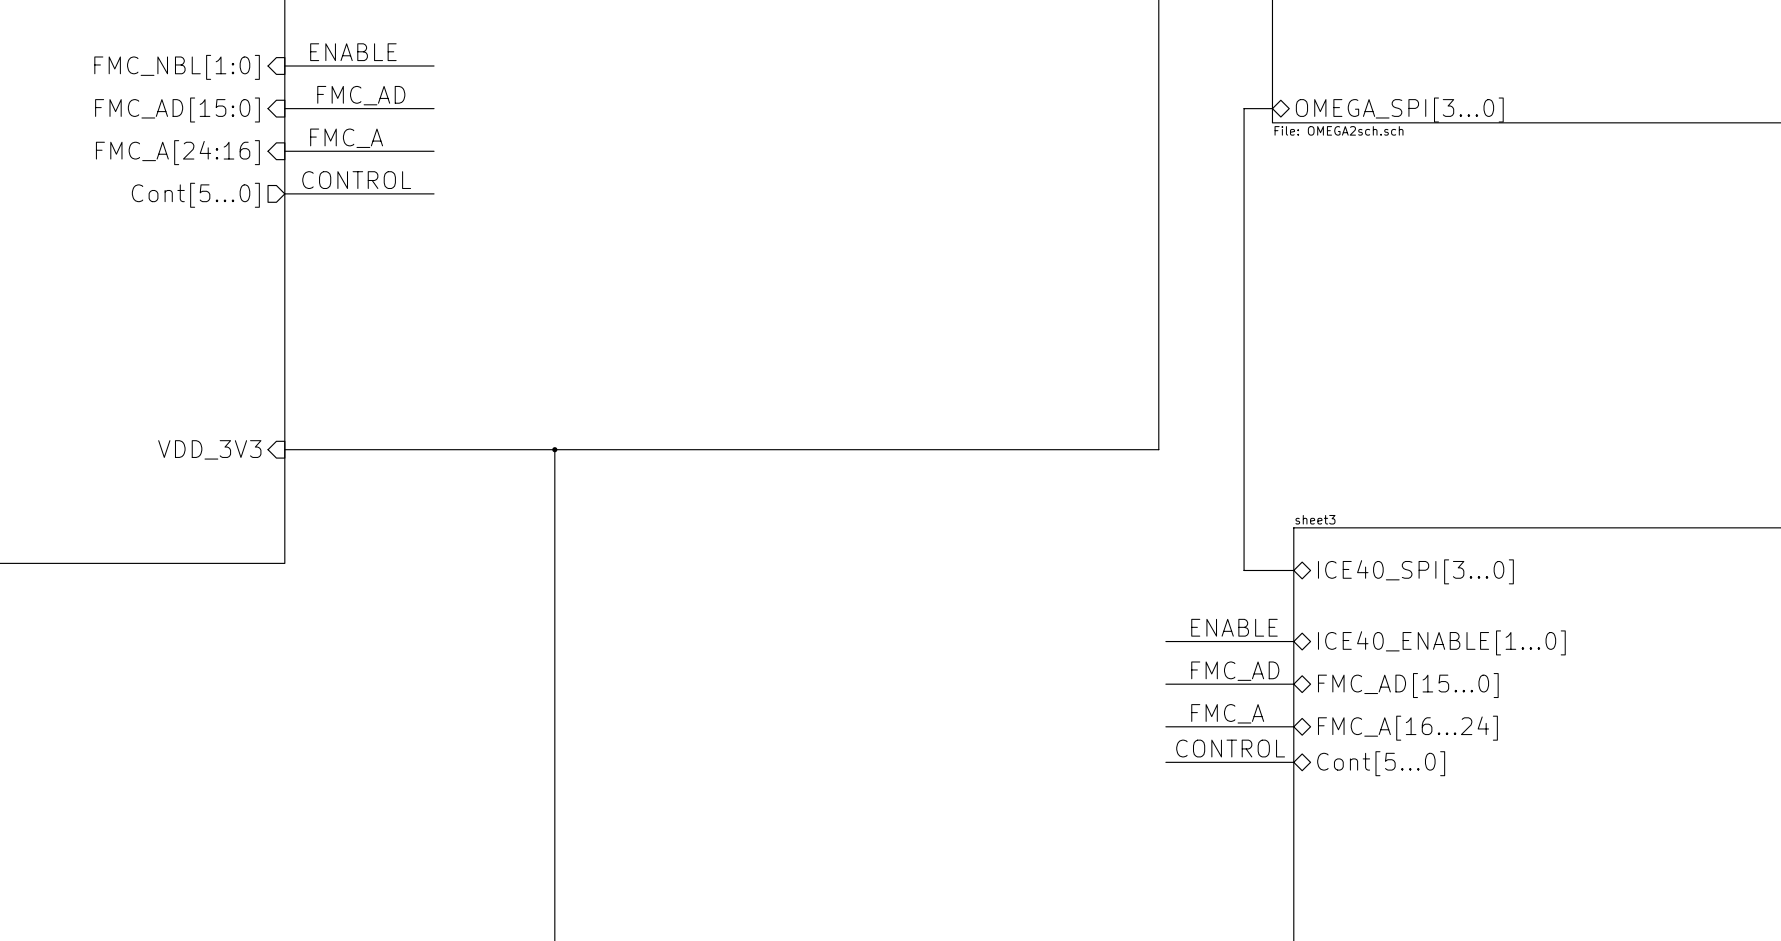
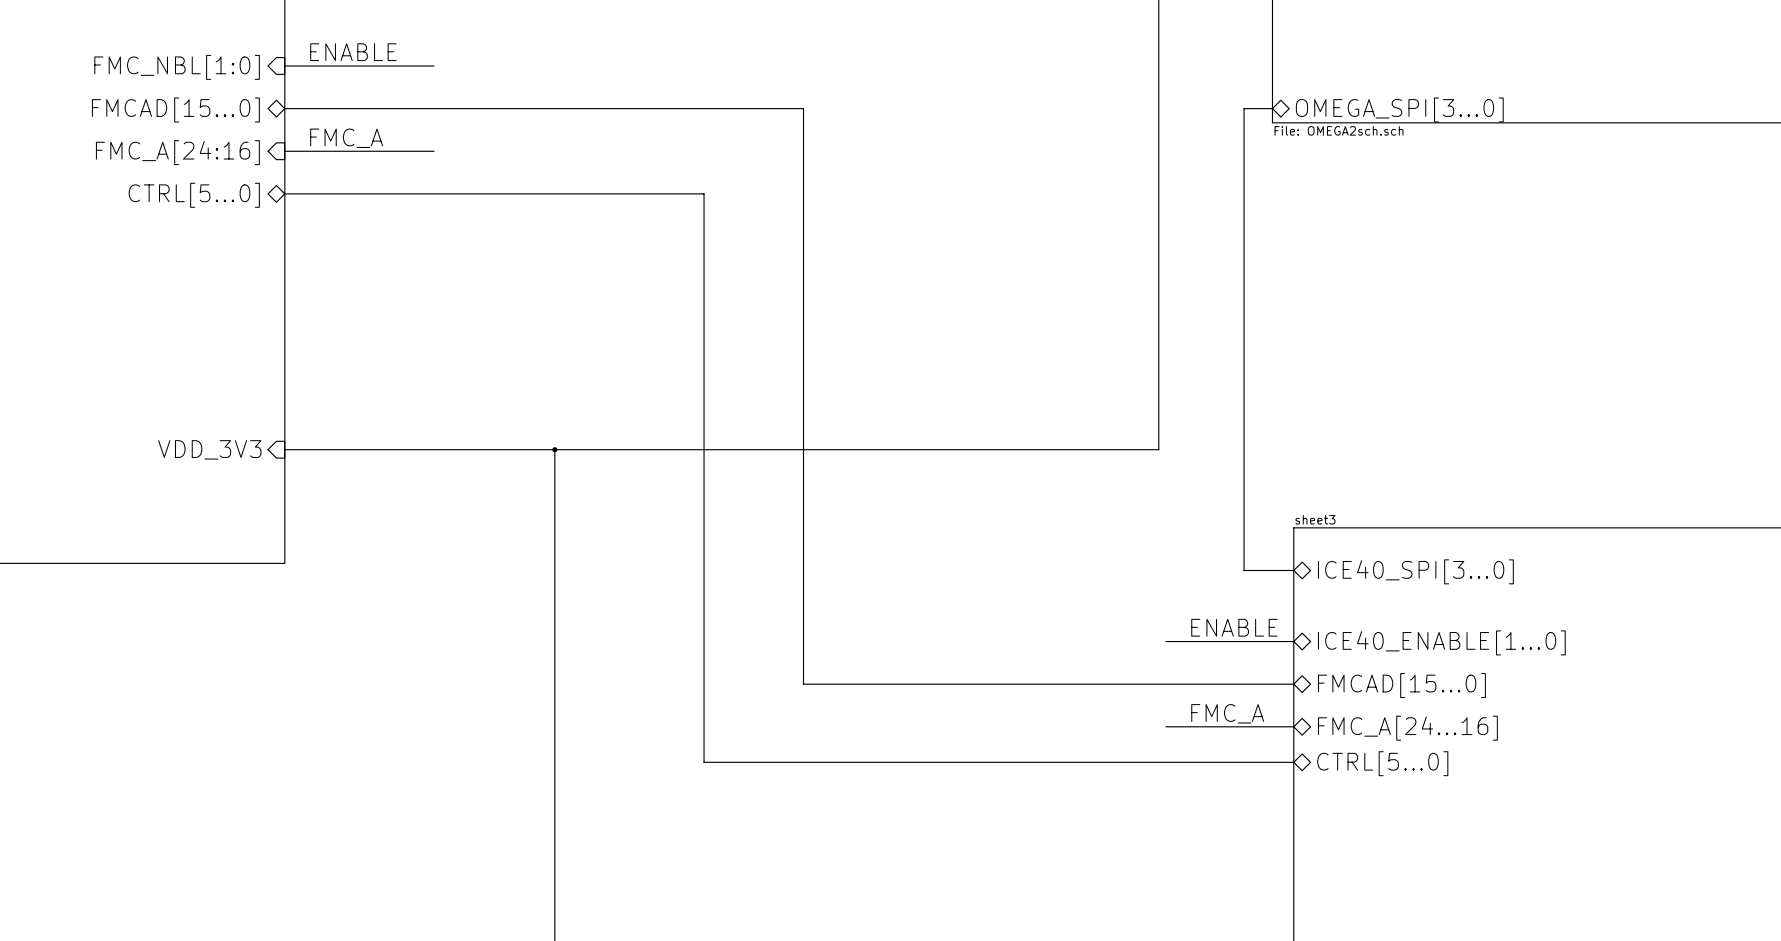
label: FMC_AD (361, 95) -> none
bus: none -> (434, 108) (803, 108) (803, 684) (1165, 684)
sheet pin shape: input (177, 110) -> bidirectional (175, 110)
sheet pin: FMC_AD[15:0] (177, 110) -> FMCAD[15...0] (175, 110)
label: CONTROL (356, 180) -> none
bus: none -> (434, 193) (704, 193) (704, 762) (1165, 762)
sheet pin shape: output (195, 195) -> bidirectional (194, 195)
sheet pin: Cont[5...0] (195, 195) -> CTRL[5...0] (194, 195)
label: FMC_AD (1235, 671) -> none
sheet pin: FMC_AD[15...0] (1408, 685) -> FMCAD[15...0] (1401, 685)
sheet pin: FMC_A[16...24] (1407, 728) -> FMC_A[24...16] (1407, 728)
label: CONTROL (1230, 748) -> none
sheet pin: Cont[5...0] (1381, 763) -> CTRL[5...0] (1382, 763)

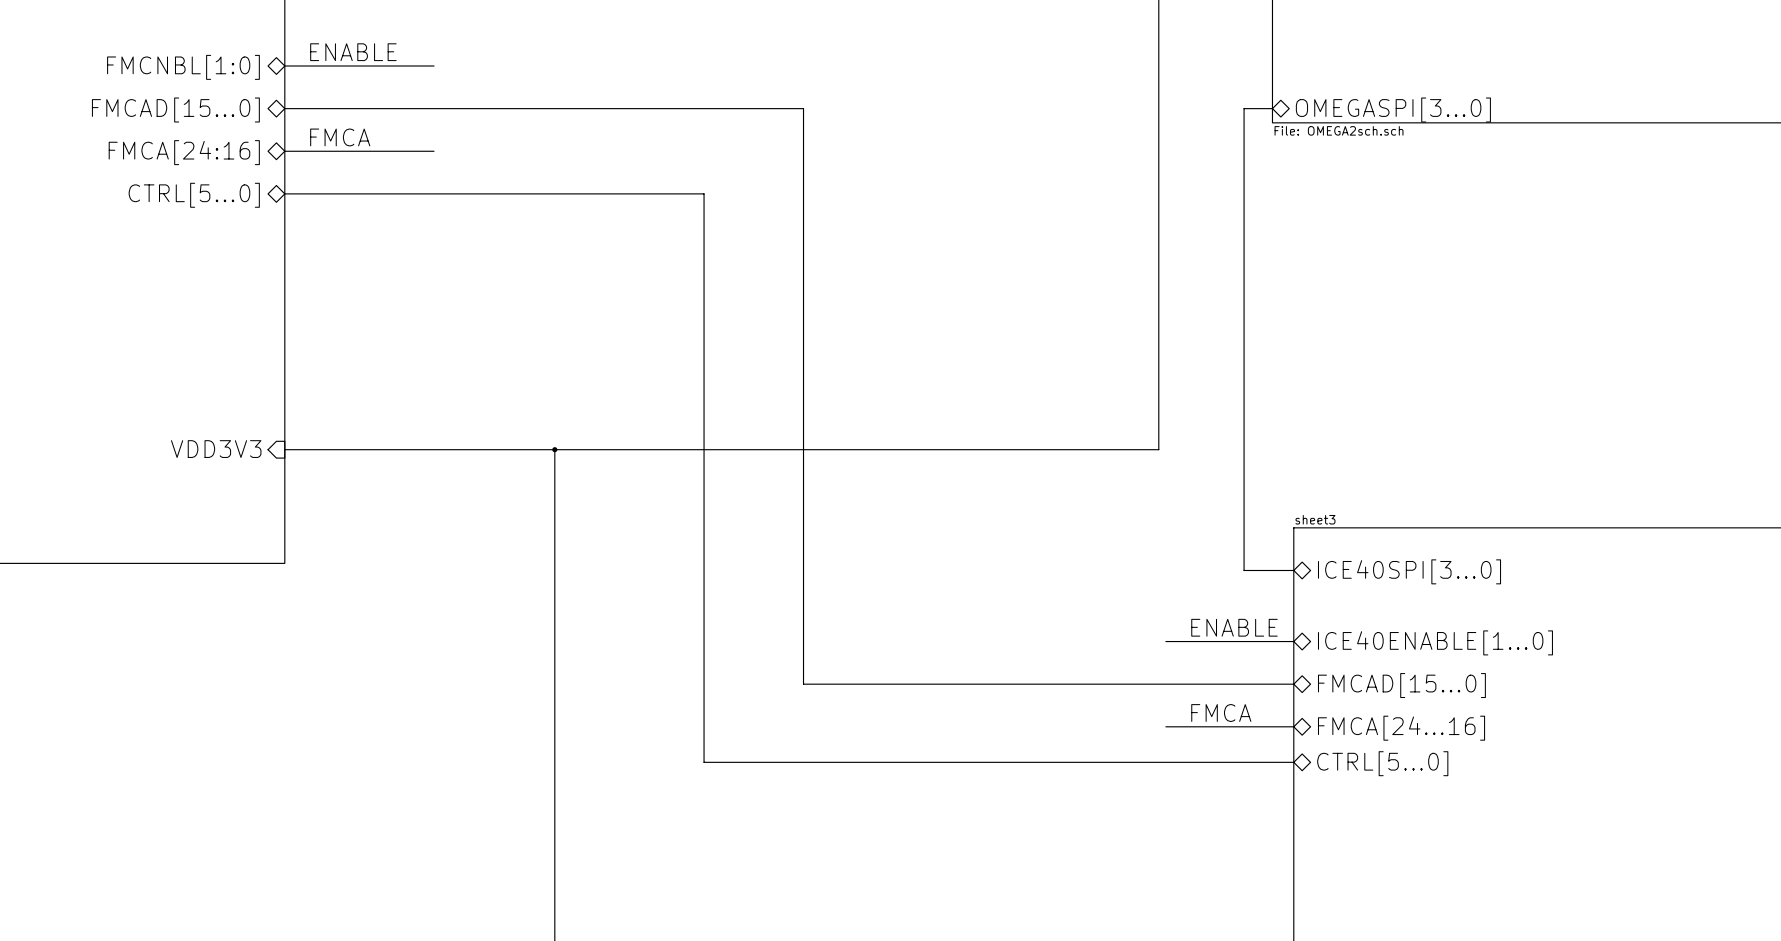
sheet pin shape: input (177, 67) -> bidirectional (183, 67)
sheet pin: FMC_NBL[1:0] (177, 67) -> FMCNBL[1:0] (183, 67)
sheet pin: OMEGA_SPI[3...0] (1399, 110) -> OMEGASPI[3...0] (1393, 110)
label: FMC_A (346, 138) -> FMCA (340, 137)
sheet pin shape: input (177, 152) -> bidirectional (184, 152)
sheet pin: FMC_A[24:16] (177, 152) -> FMCA[24:16] (184, 152)
sheet pin: VDD_3V3 (209, 449) -> VDD3V3 (216, 449)
sheet pin: ICE40_SPI[3...0] (1415, 571) -> ICE40SPI[3...0] (1409, 571)
sheet pin: ICE40_ENABLE[1...0] (1441, 642) -> ICE40ENABLE[1...0] (1435, 642)
label: FMC_A (1227, 713) -> FMCA (1221, 713)
sheet pin: FMC_A[24...16] (1407, 728) -> FMCA[24...16] (1401, 728)

